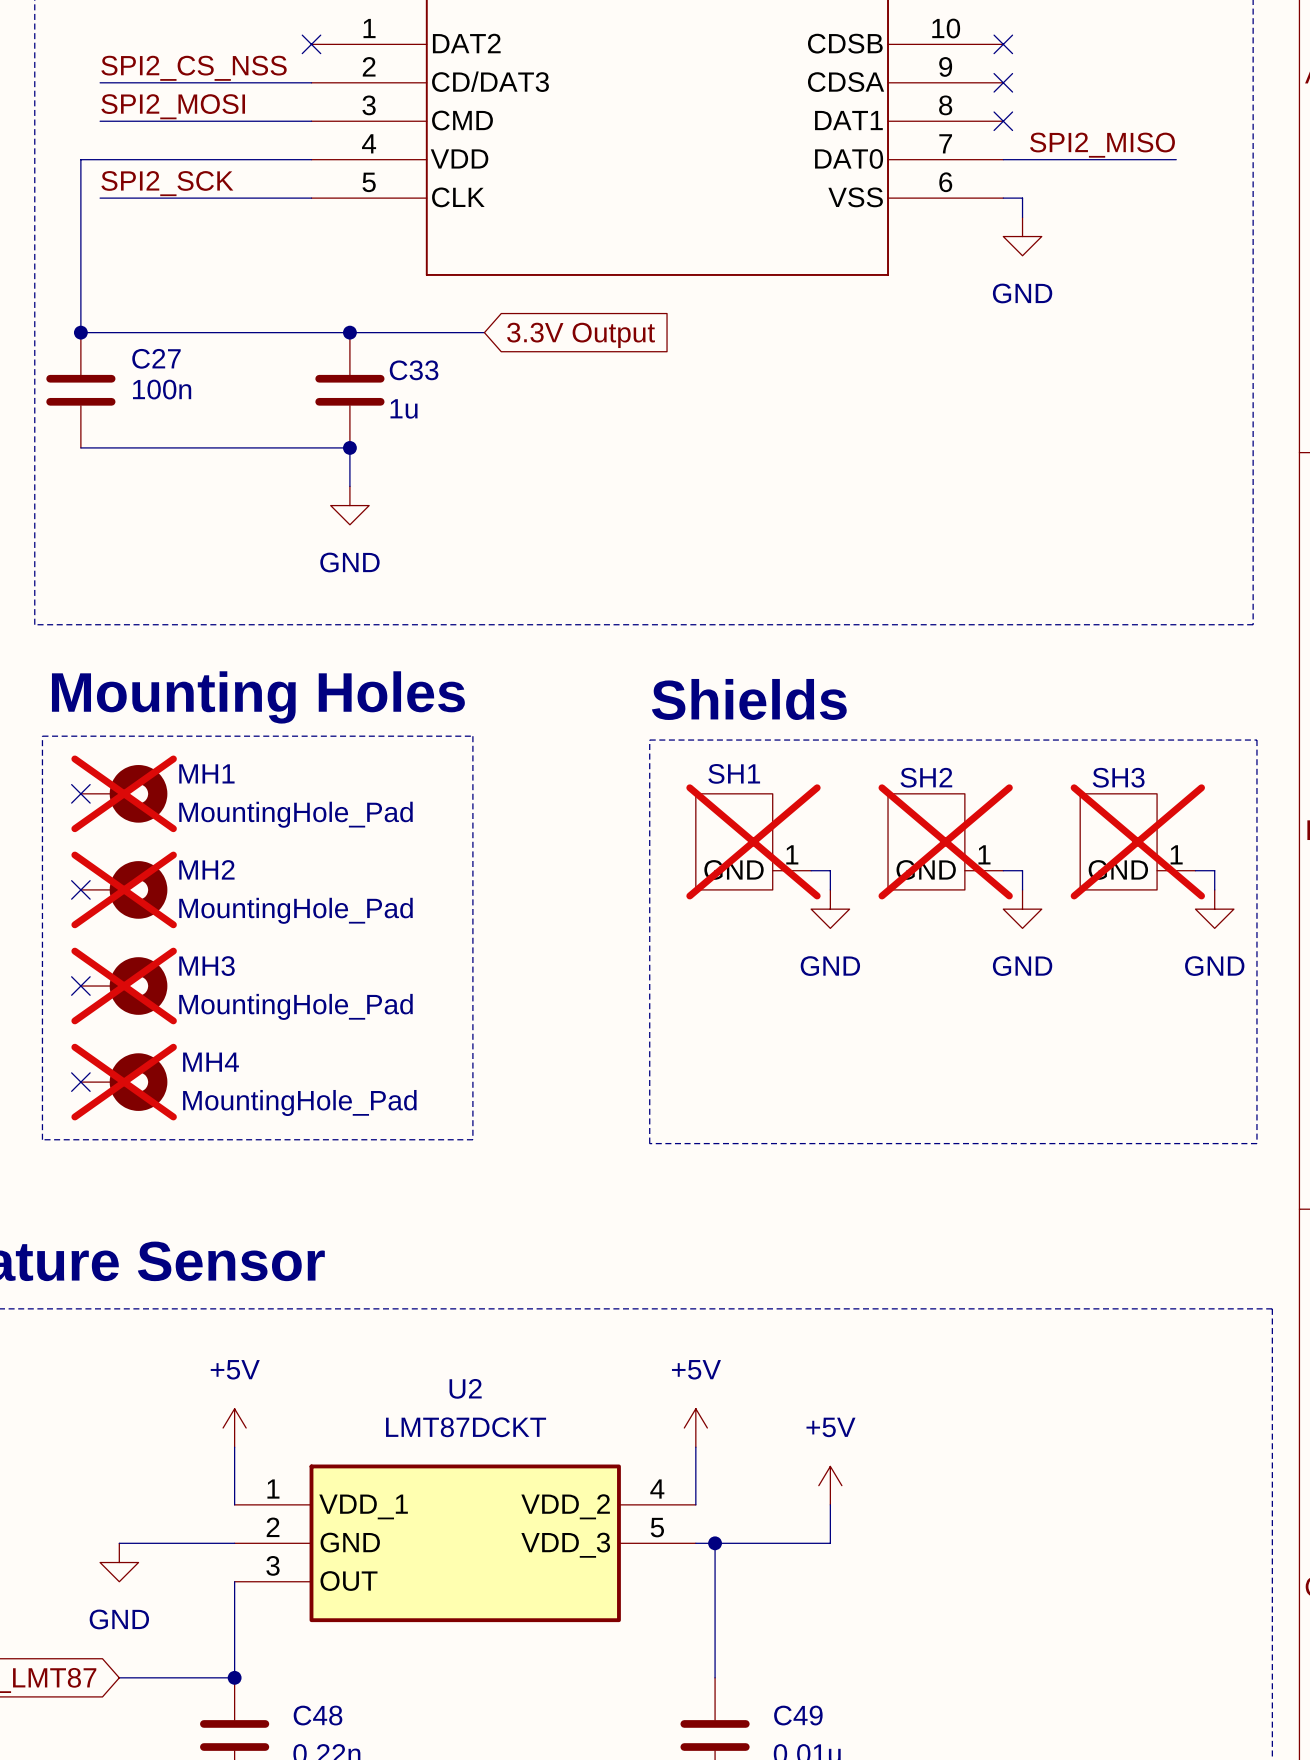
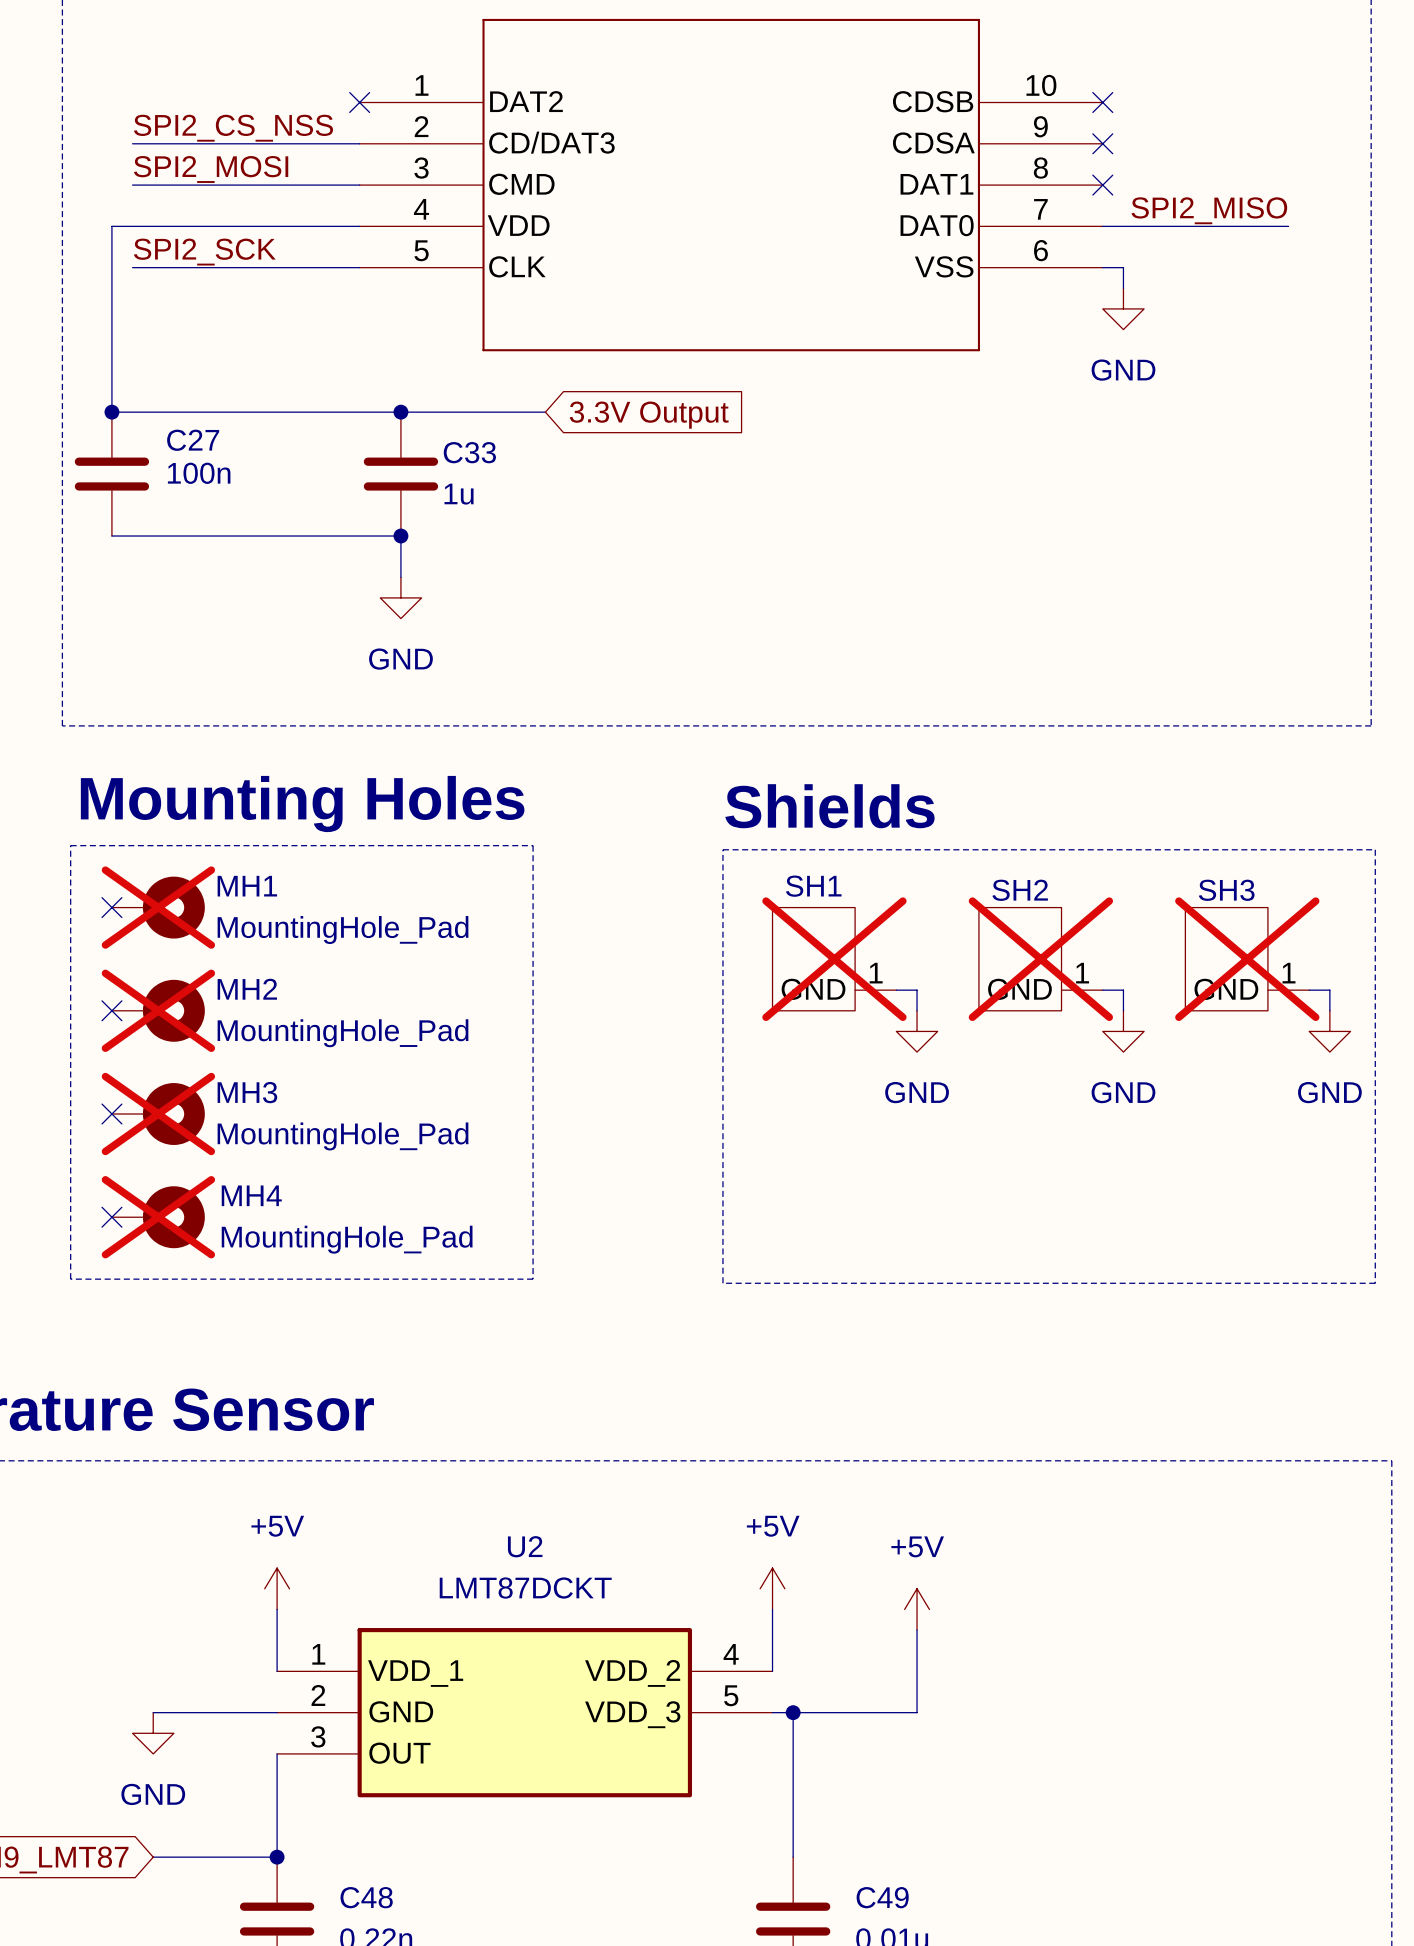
power symbol position: +5V (830, 1485) -> +5V (917, 1609)

